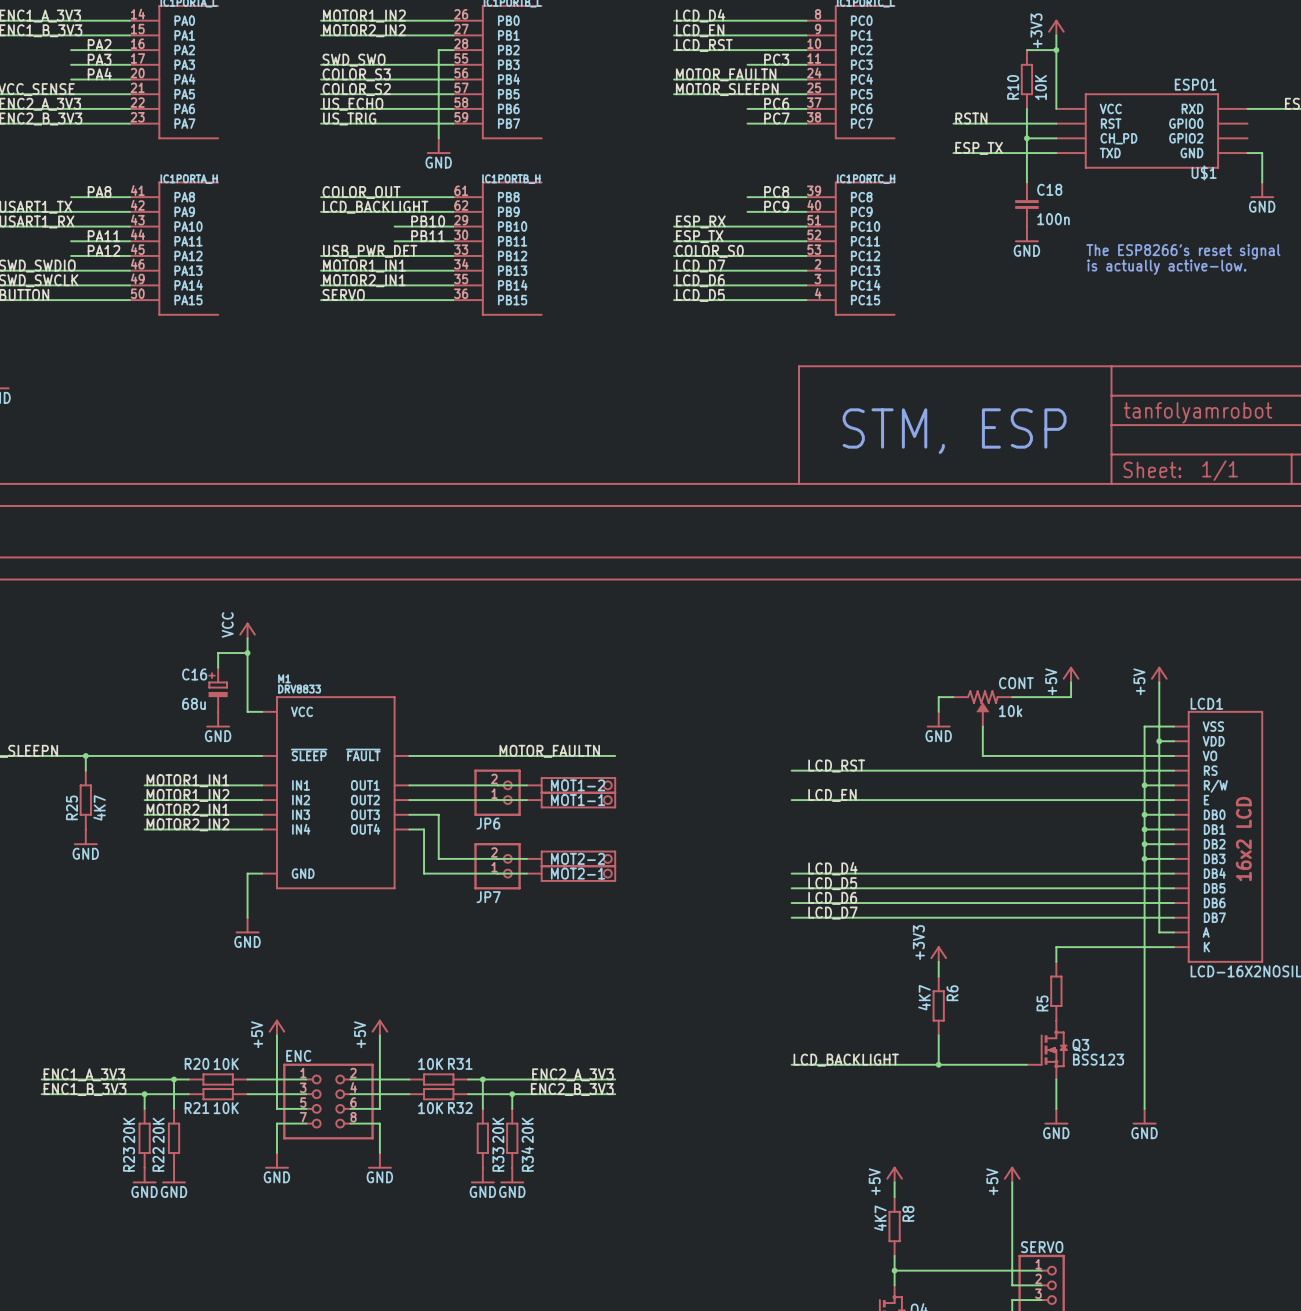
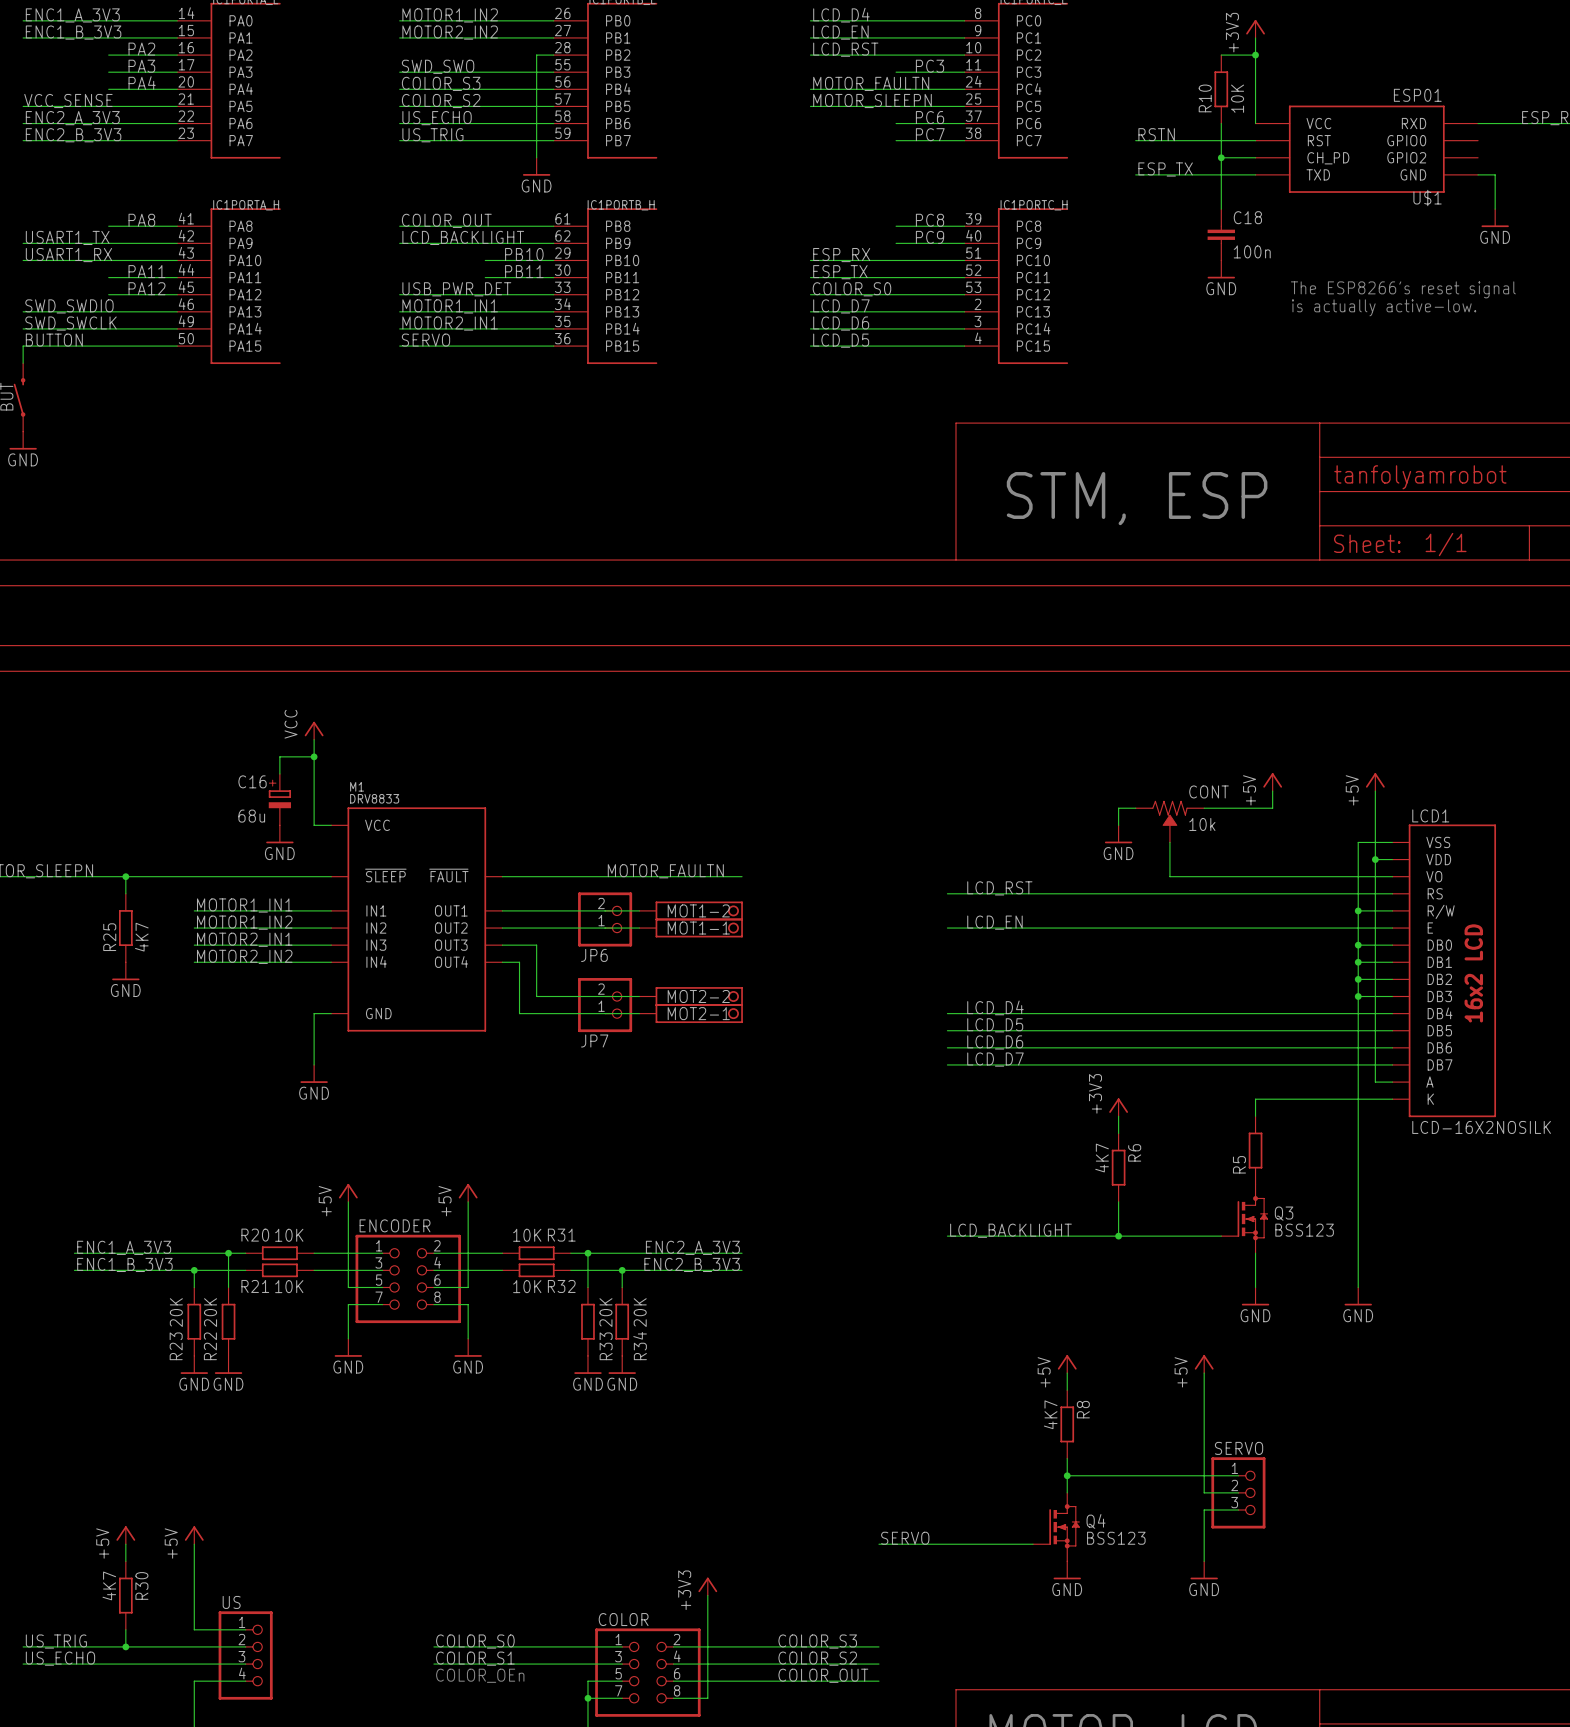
ENC name: ENC (298, 1055) -> ENCODER (395, 1225)

